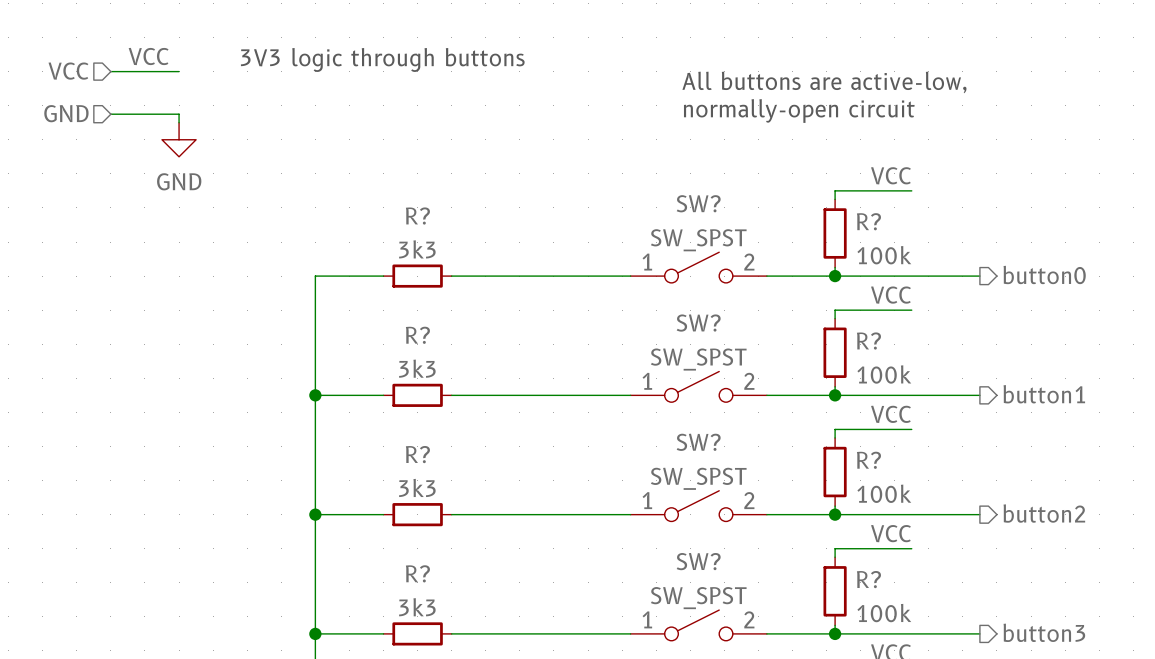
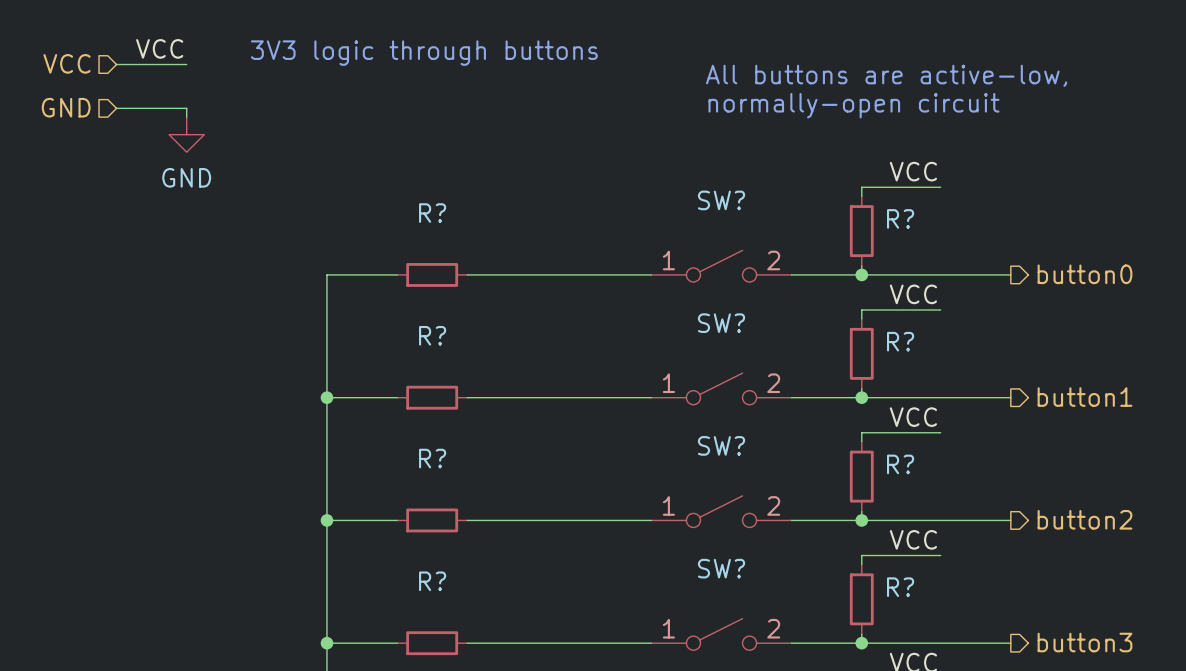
SW? value: SW_SPST (698, 240) -> none
R? value: 3k3 (417, 249) -> none
R? value: 100k (884, 255) -> none
SW? value: SW_SPST (698, 359) -> none
R? value: 3k3 (417, 368) -> none
R? value: 100k (884, 374) -> none
SW? value: SW_SPST (698, 478) -> none
R? value: 3k3 (417, 487) -> none
R? value: 100k (884, 493) -> none
SW? value: SW_SPST (698, 598) -> none
R? value: 3k3 (417, 607) -> none
R? value: 100k (884, 613) -> none

